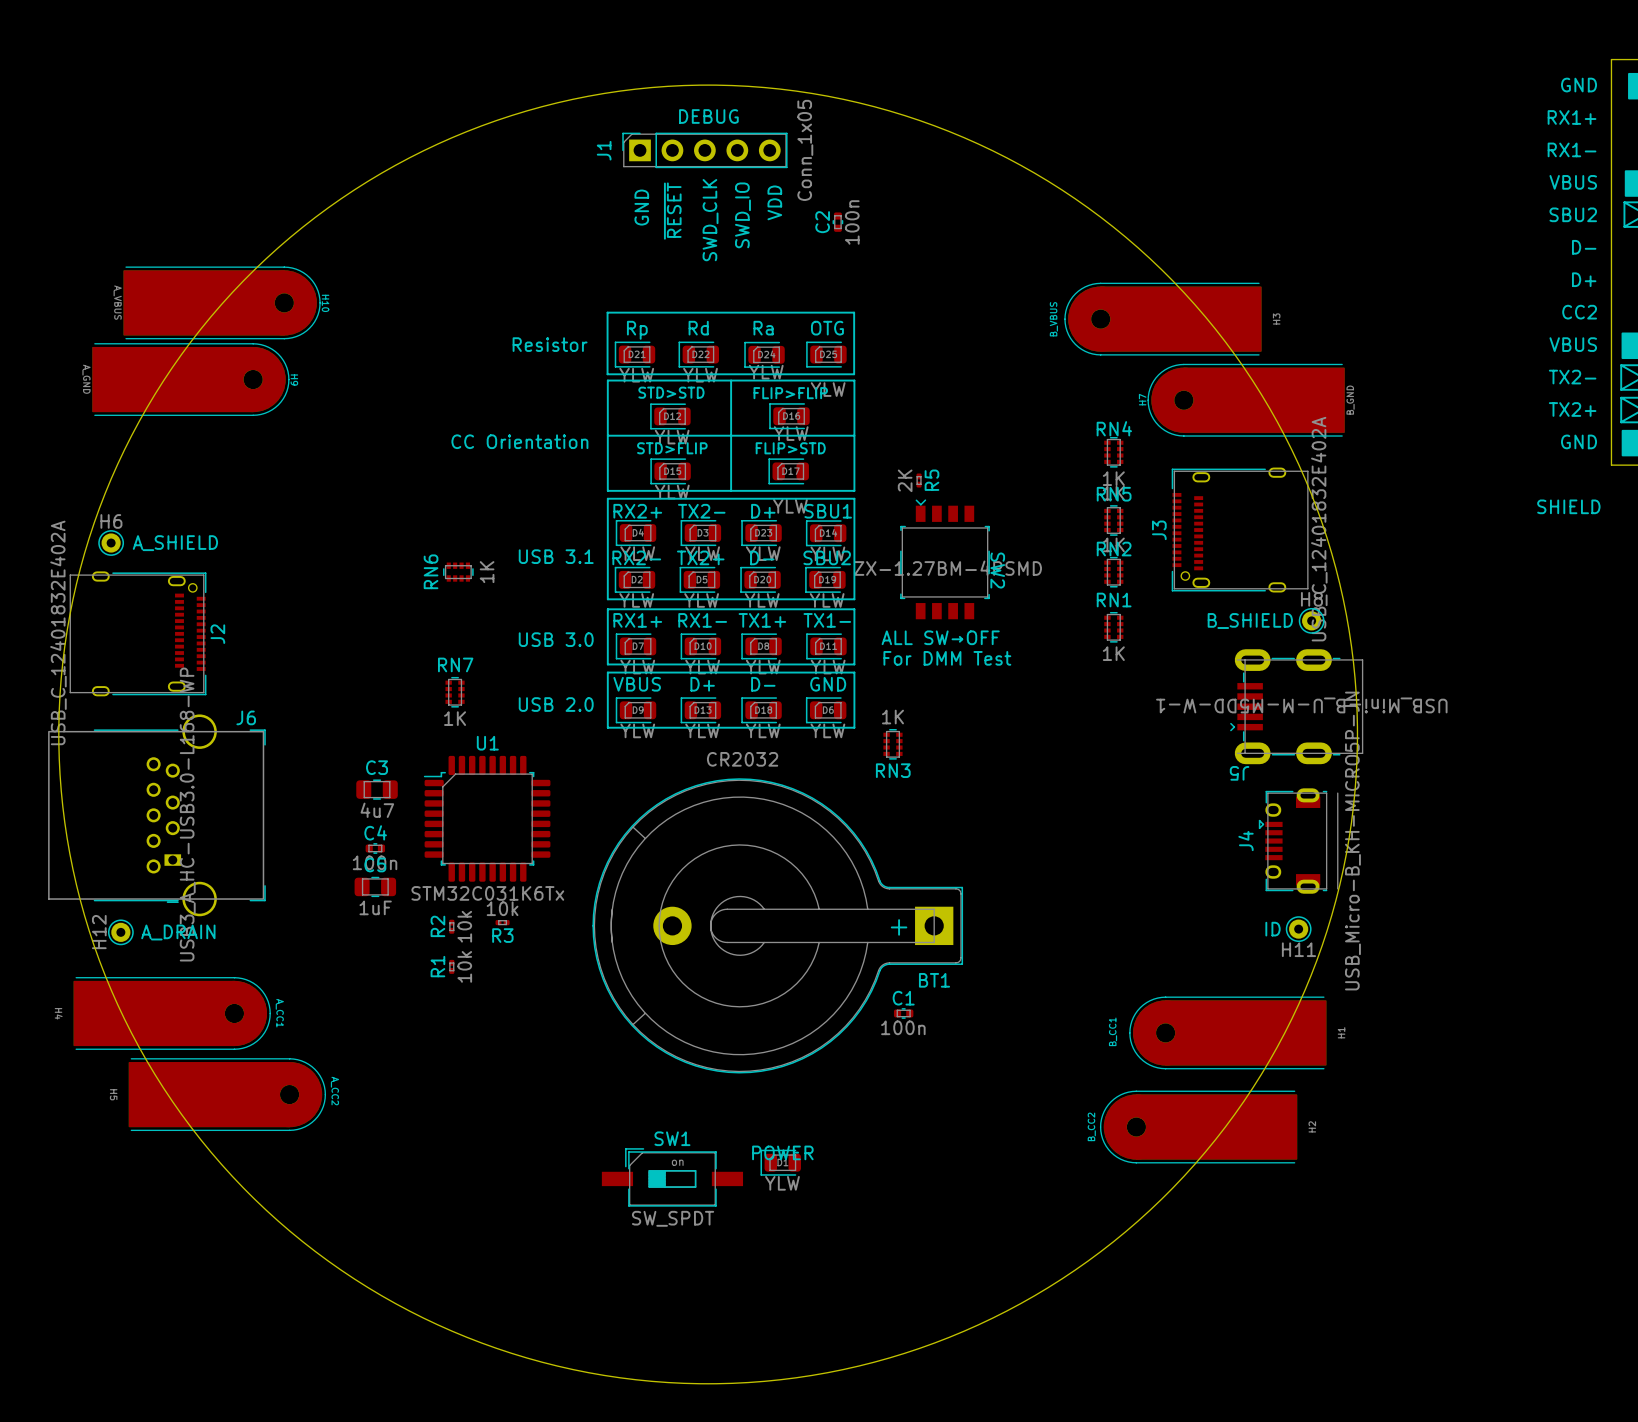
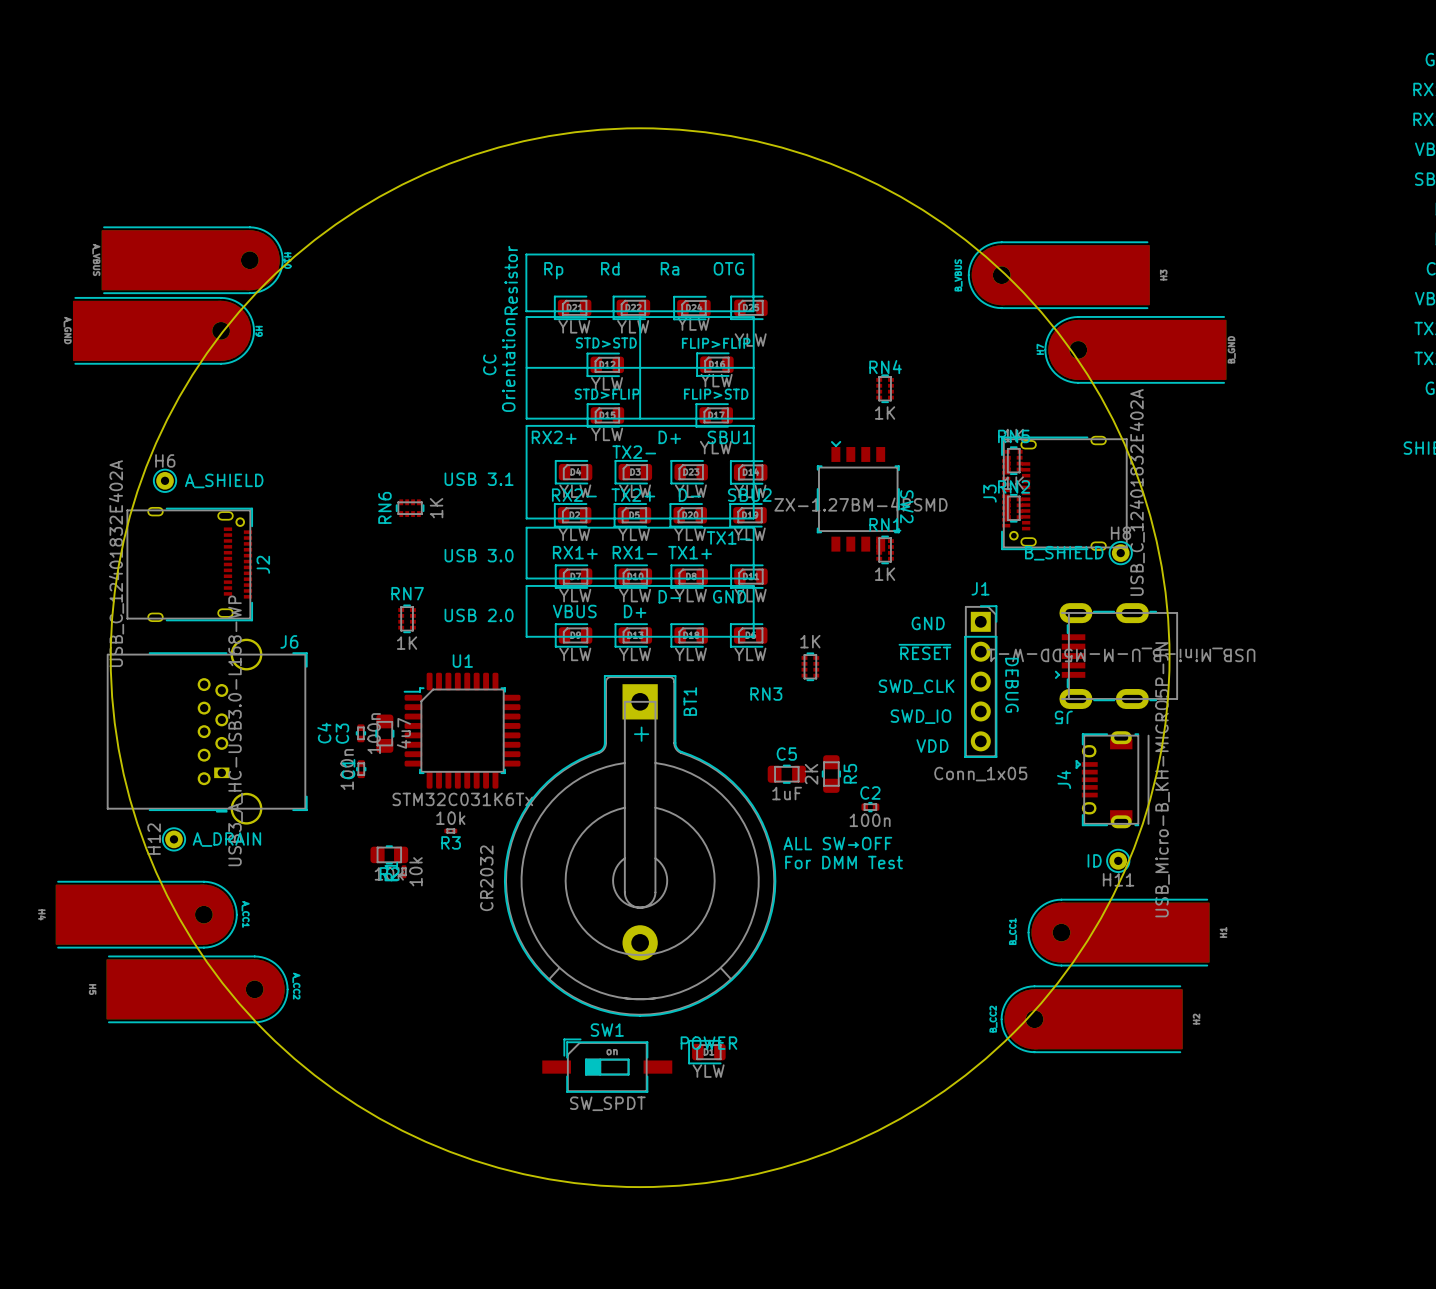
round board edge size: [58, 84, 1359, 1385] -> [110, 127, 1171, 1188]
text: DEBUG (708, 116) -> none
J1 rotation: 0° (704, 150) -> 90° clockwise (980, 681)
J1 position: (704, 150) -> (980, 681)
text: VDD (774, 202) -> none
text: GND (641, 207) -> none
text: ~{RESET} (672, 211) -> none
text: SWD_IO (742, 215) -> none
text: SWD_CLK (710, 220) -> none
C2 rotation: 0° (837, 222) -> 90° clockwise (870, 807)
C2 position: (837, 222) -> (870, 807)
line: (607, 312) (854, 312) (854, 374) (607, 374) (607, 312) -> (526, 254) (753, 254) (753, 311) (526, 311) (526, 254)
text position: Rd (698, 328) -> Rd (610, 268)
text position: Ra (763, 328) -> Ra (670, 268)
text position: OTG (827, 328) -> OTG (728, 268)
text position: Rp (637, 330) -> Rp (553, 270)
text rotation: 0° (550, 344) -> 90° counterclockwise (511, 280)
line: (607, 380) (607, 490) (854, 490) (854, 380) (607, 380) -> (526, 317) (526, 418) (753, 418) (753, 317) (526, 317)
line: (731, 380) (731, 490) -> (640, 317) (640, 418)
text: none -> CC (489, 364)
line: (607, 435) (854, 435) -> (526, 367) (753, 367)
text: CC Orientation (519, 441) -> Orientation (508, 365)
RN4 position: (1113, 452) -> (885, 388)
R5 footprint: [916, 473, 922, 488] -> [822, 755, 841, 793]
line: (607, 498) (607, 599) (854, 599) (854, 498) (607, 498) -> (526, 425) (526, 518) (753, 518) (753, 425) (526, 425)
text position: RX2+ (637, 511) -> RX2+ (554, 437)
text position: D+ (763, 511) -> D+ (669, 437)
text position: SBU1 (828, 511) -> SBU1 (729, 437)
J3 position: (1240, 530) -> (1064, 493)
H6 position: (111, 543) -> (165, 480)
text position: USB 3.1 (556, 556) -> USB 3.1 (479, 479)
line: (607, 609) (607, 664) (854, 664) (854, 609) (607, 609) -> (526, 527) (526, 578) (753, 578) (753, 527) (526, 527)
text position: TX1- (827, 620) -> TX1- (728, 537)
H8 position: (1311, 620) -> (1120, 553)
RN1 position: (1113, 627) -> (885, 549)
J2 position: (138, 633) -> (189, 564)
text position: ALL SW→OFF (940, 637) -> ALL SW→OFF (837, 843)
text position: USB 3.0 (556, 639) -> USB 3.0 (479, 555)
text position: For DMM Test (947, 658) -> For DMM Test (844, 862)
line: (607, 672) (854, 672) (854, 727) (607, 727) (607, 672) -> (526, 585) (753, 585) (753, 636) (526, 636) (526, 585)
text position: D- (763, 684) -> D- (669, 596)
text position: GND (828, 684) -> GND (729, 596)
text: none -> GND (928, 623)
text position: USB 2.0 (556, 704) -> USB 2.0 (479, 615)
J5 position: (1296, 706) -> (1116, 656)
text: none -> ~{RESET} (924, 652)
text: none -> DEBUG (1012, 685)
text: none -> SWD_CLK (916, 686)
C3 name position: C3 (377, 767) -> C3 (342, 733)
RN3 name position: RN3 (893, 770) -> RN3 (766, 694)
C3 rotation: 0° (377, 789) -> 90° clockwise (384, 733)
C3 position: (377, 789) -> (384, 733)
text: none -> SWD_IO (920, 716)
C3 value position: 4u7 (377, 810) -> 4u7 (403, 733)
J6 position: (156, 815) -> (207, 731)
U1 position: (487, 818) -> (462, 730)
text: none -> VDD (932, 745)
C4 name position: C4 (375, 832) -> C4 (324, 733)
J4 position: (1298, 841) -> (1112, 779)
C4 rotation: 0° (375, 848) -> 90° clockwise (360, 733)
C4 position: (375, 848) -> (360, 733)
C5 position: (375, 886) -> (786, 774)
R2 footprint: [449, 919, 455, 934] -> [370, 845, 409, 865]
BT1 rotation: 0° (777, 925) -> 90° counterclockwise (640, 845)
H11 position: (1298, 929) -> (1118, 860)
H12 position: (120, 932) -> (173, 839)
C1 rotation: 0° (903, 1013) -> 90° clockwise (361, 769)
C1 position: (903, 1013) -> (361, 769)

